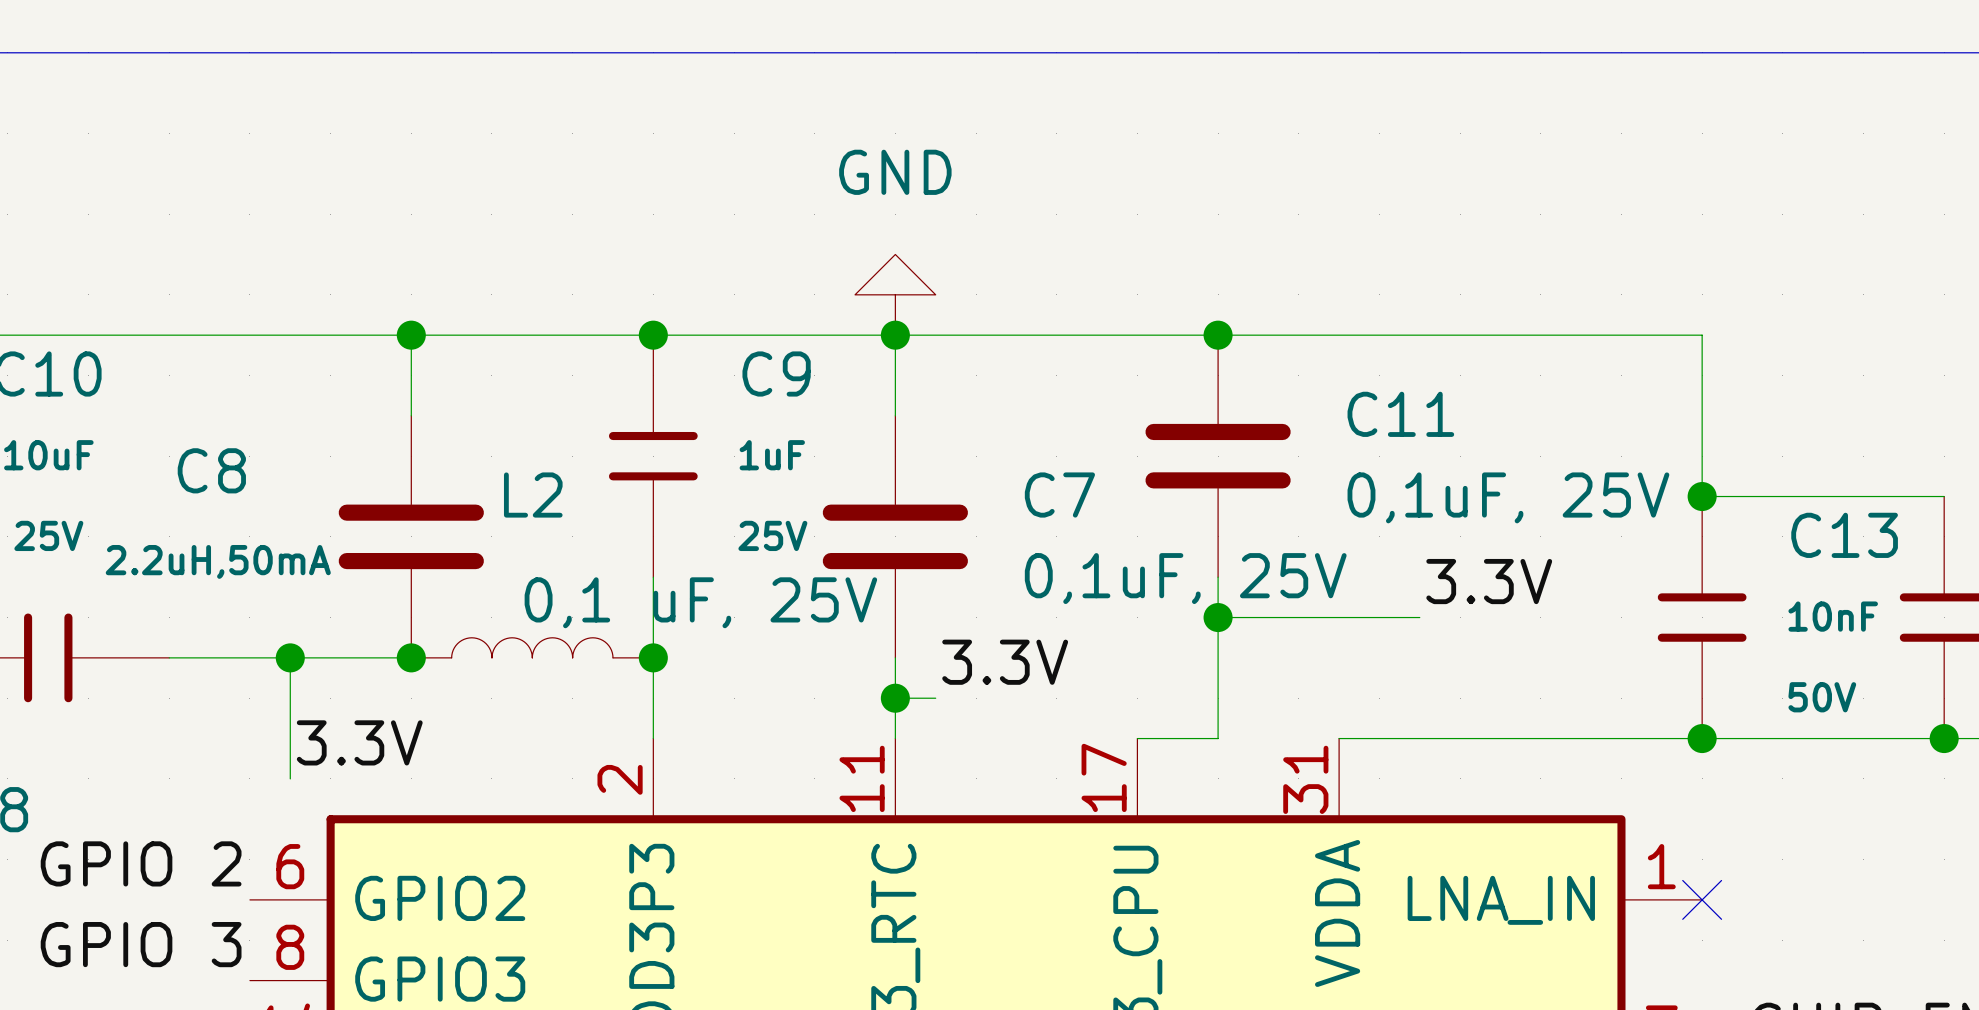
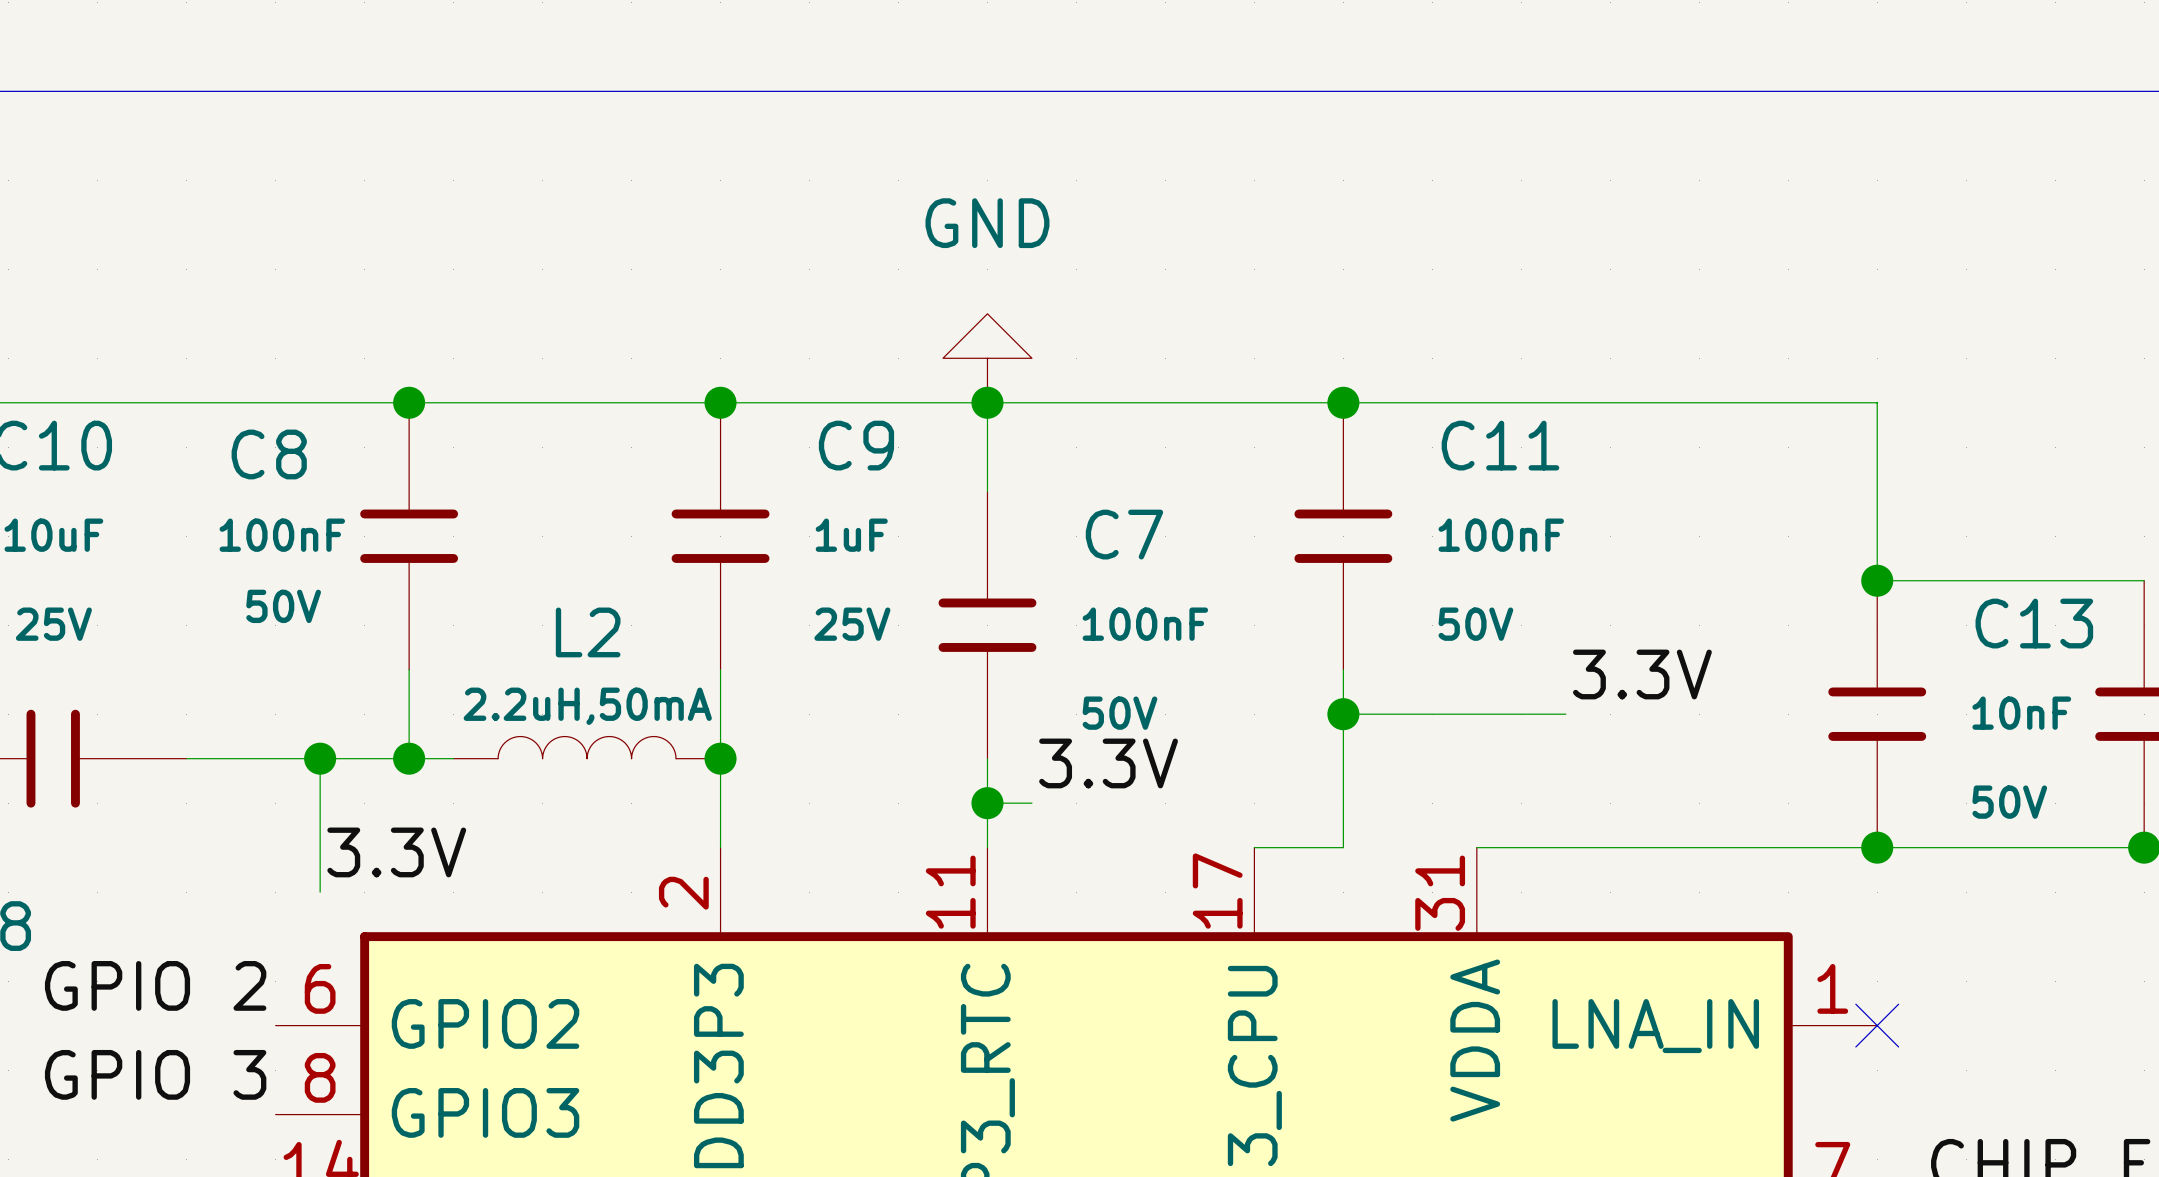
wire: (411, 335) (411, 415) -> (409, 669) (409, 758)
junction position: (411, 335) -> (409, 402)
C11 symbol: [1145, 335, 1291, 578] -> [1294, 402, 1393, 670]
C11 name position: C11 (1400, 414) -> C11 (1500, 445)
C8 symbol: [338, 415, 484, 658] -> [360, 402, 459, 670]
C7 symbol: [822, 415, 968, 658] -> [938, 491, 1037, 759]
C8 name position: C8 (211, 470) -> C8 (269, 454)
L2 name position: L2 (533, 495) -> L2 (588, 632)
C7 name position: C7 (1059, 495) -> C7 (1124, 534)
C11 value: 0,1uF, 25V (1508, 497) -> 100nF (1501, 535)
C8 text: none -> 50V (283, 606)
C11 text: none -> 50V (1475, 624)
L2 value position: 2.2uH,50mA (218, 561) -> 2.2uH,50mA (587, 706)
C7 value: 0,1uF, 25V (1185, 578) -> 100nF (1145, 624)
C8 value: 0,1 uF, 25V (700, 602) -> 100nF (282, 535)
C7 text: none -> 50V (1119, 713)
junction position: (411, 657) -> (409, 758)

